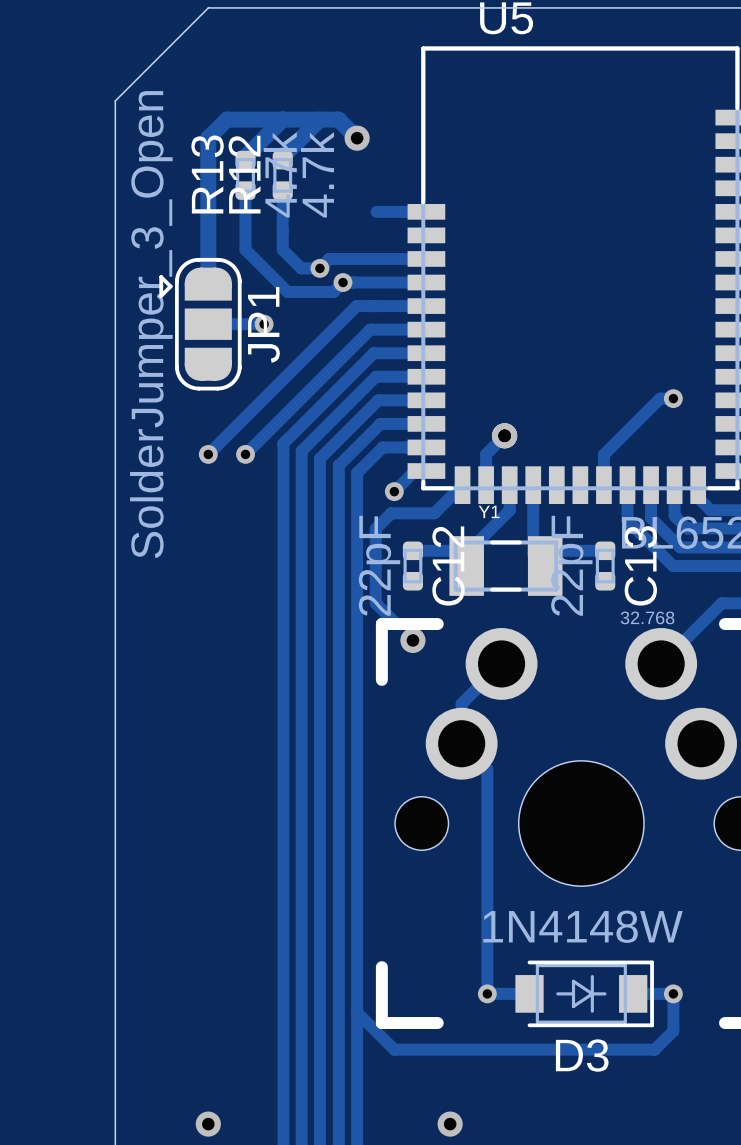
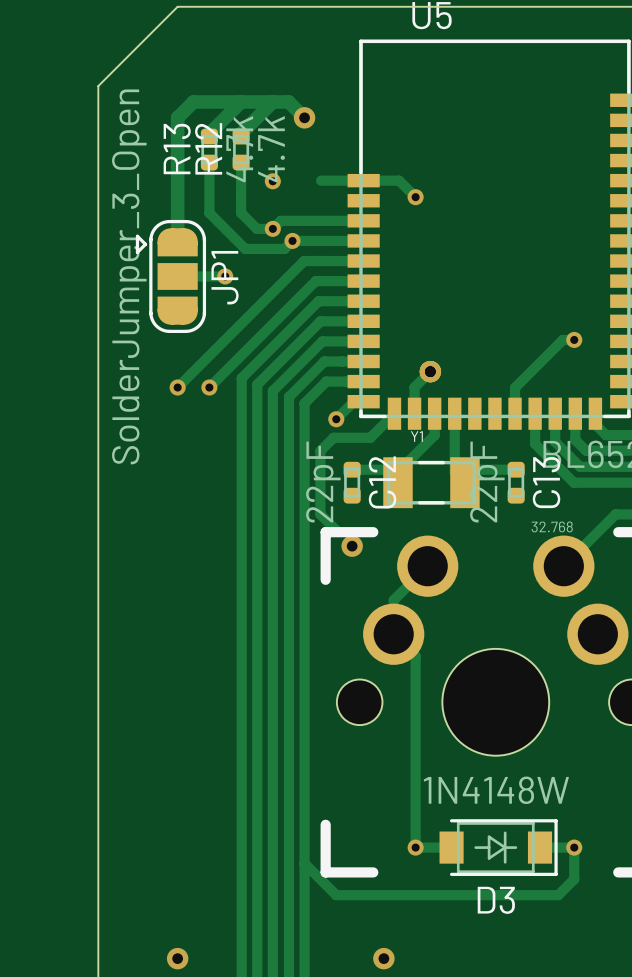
track: none -> (363, 180) (399, 180) (415, 197)
via: none -> (272, 181)
via: none -> (415, 197)

